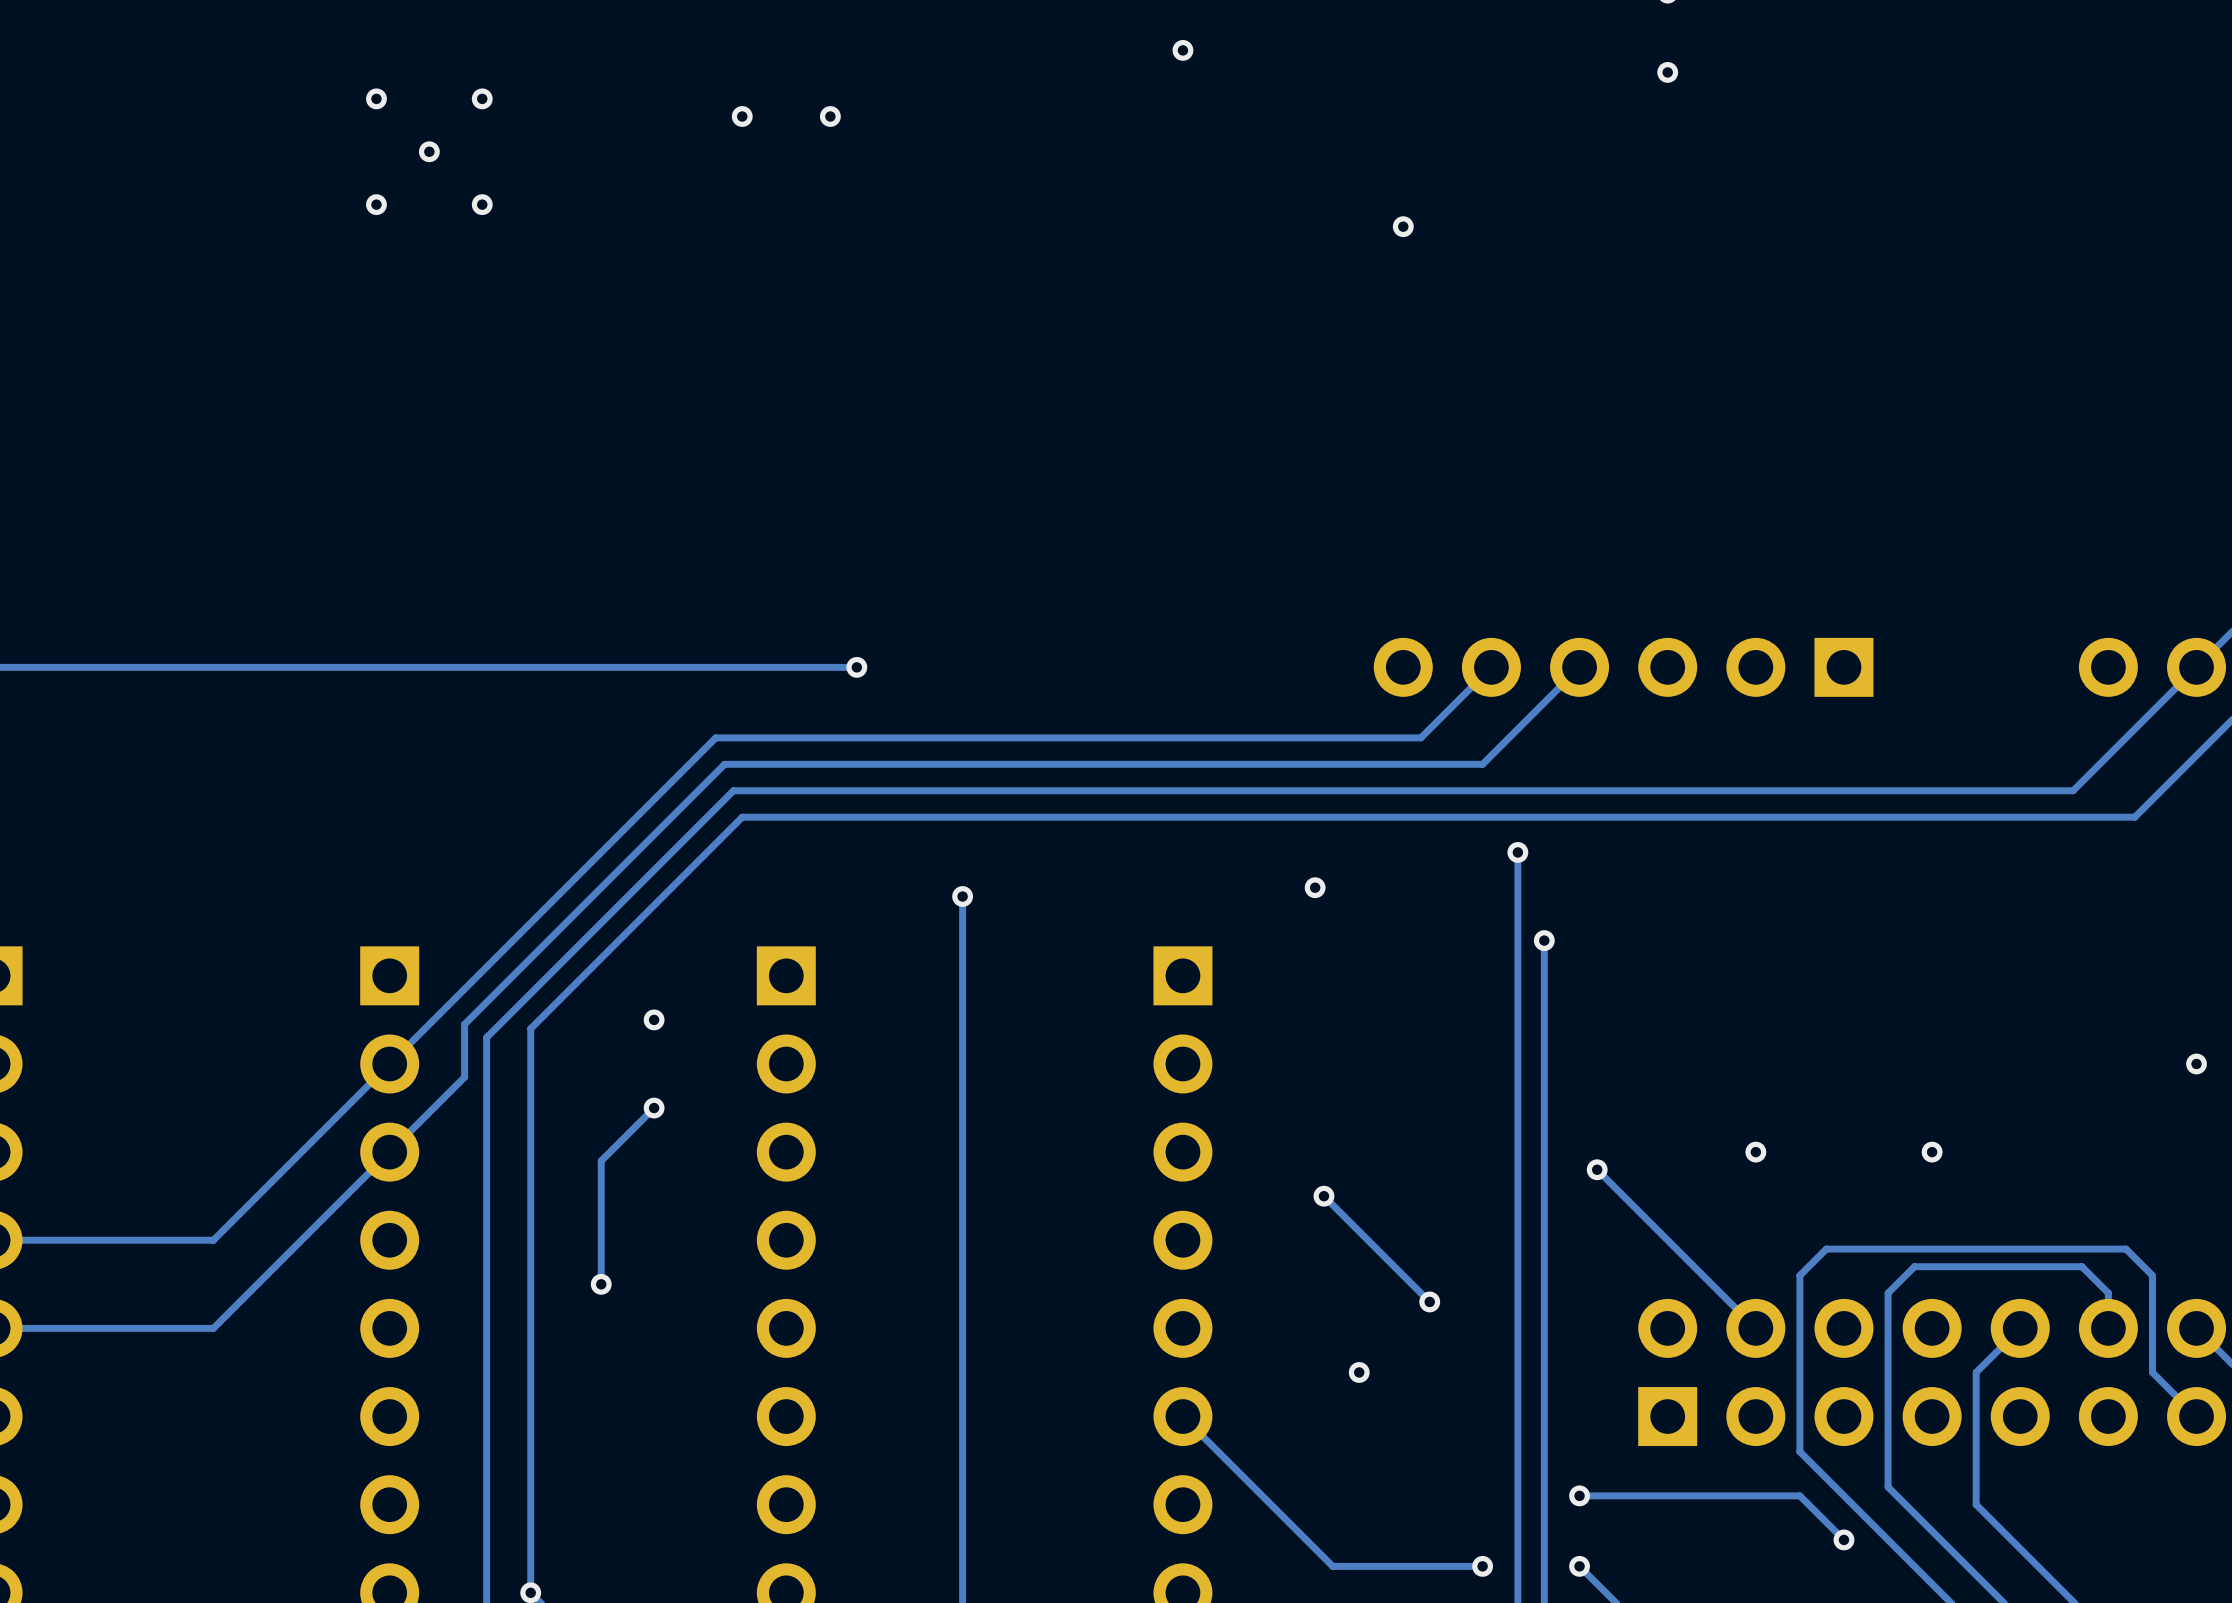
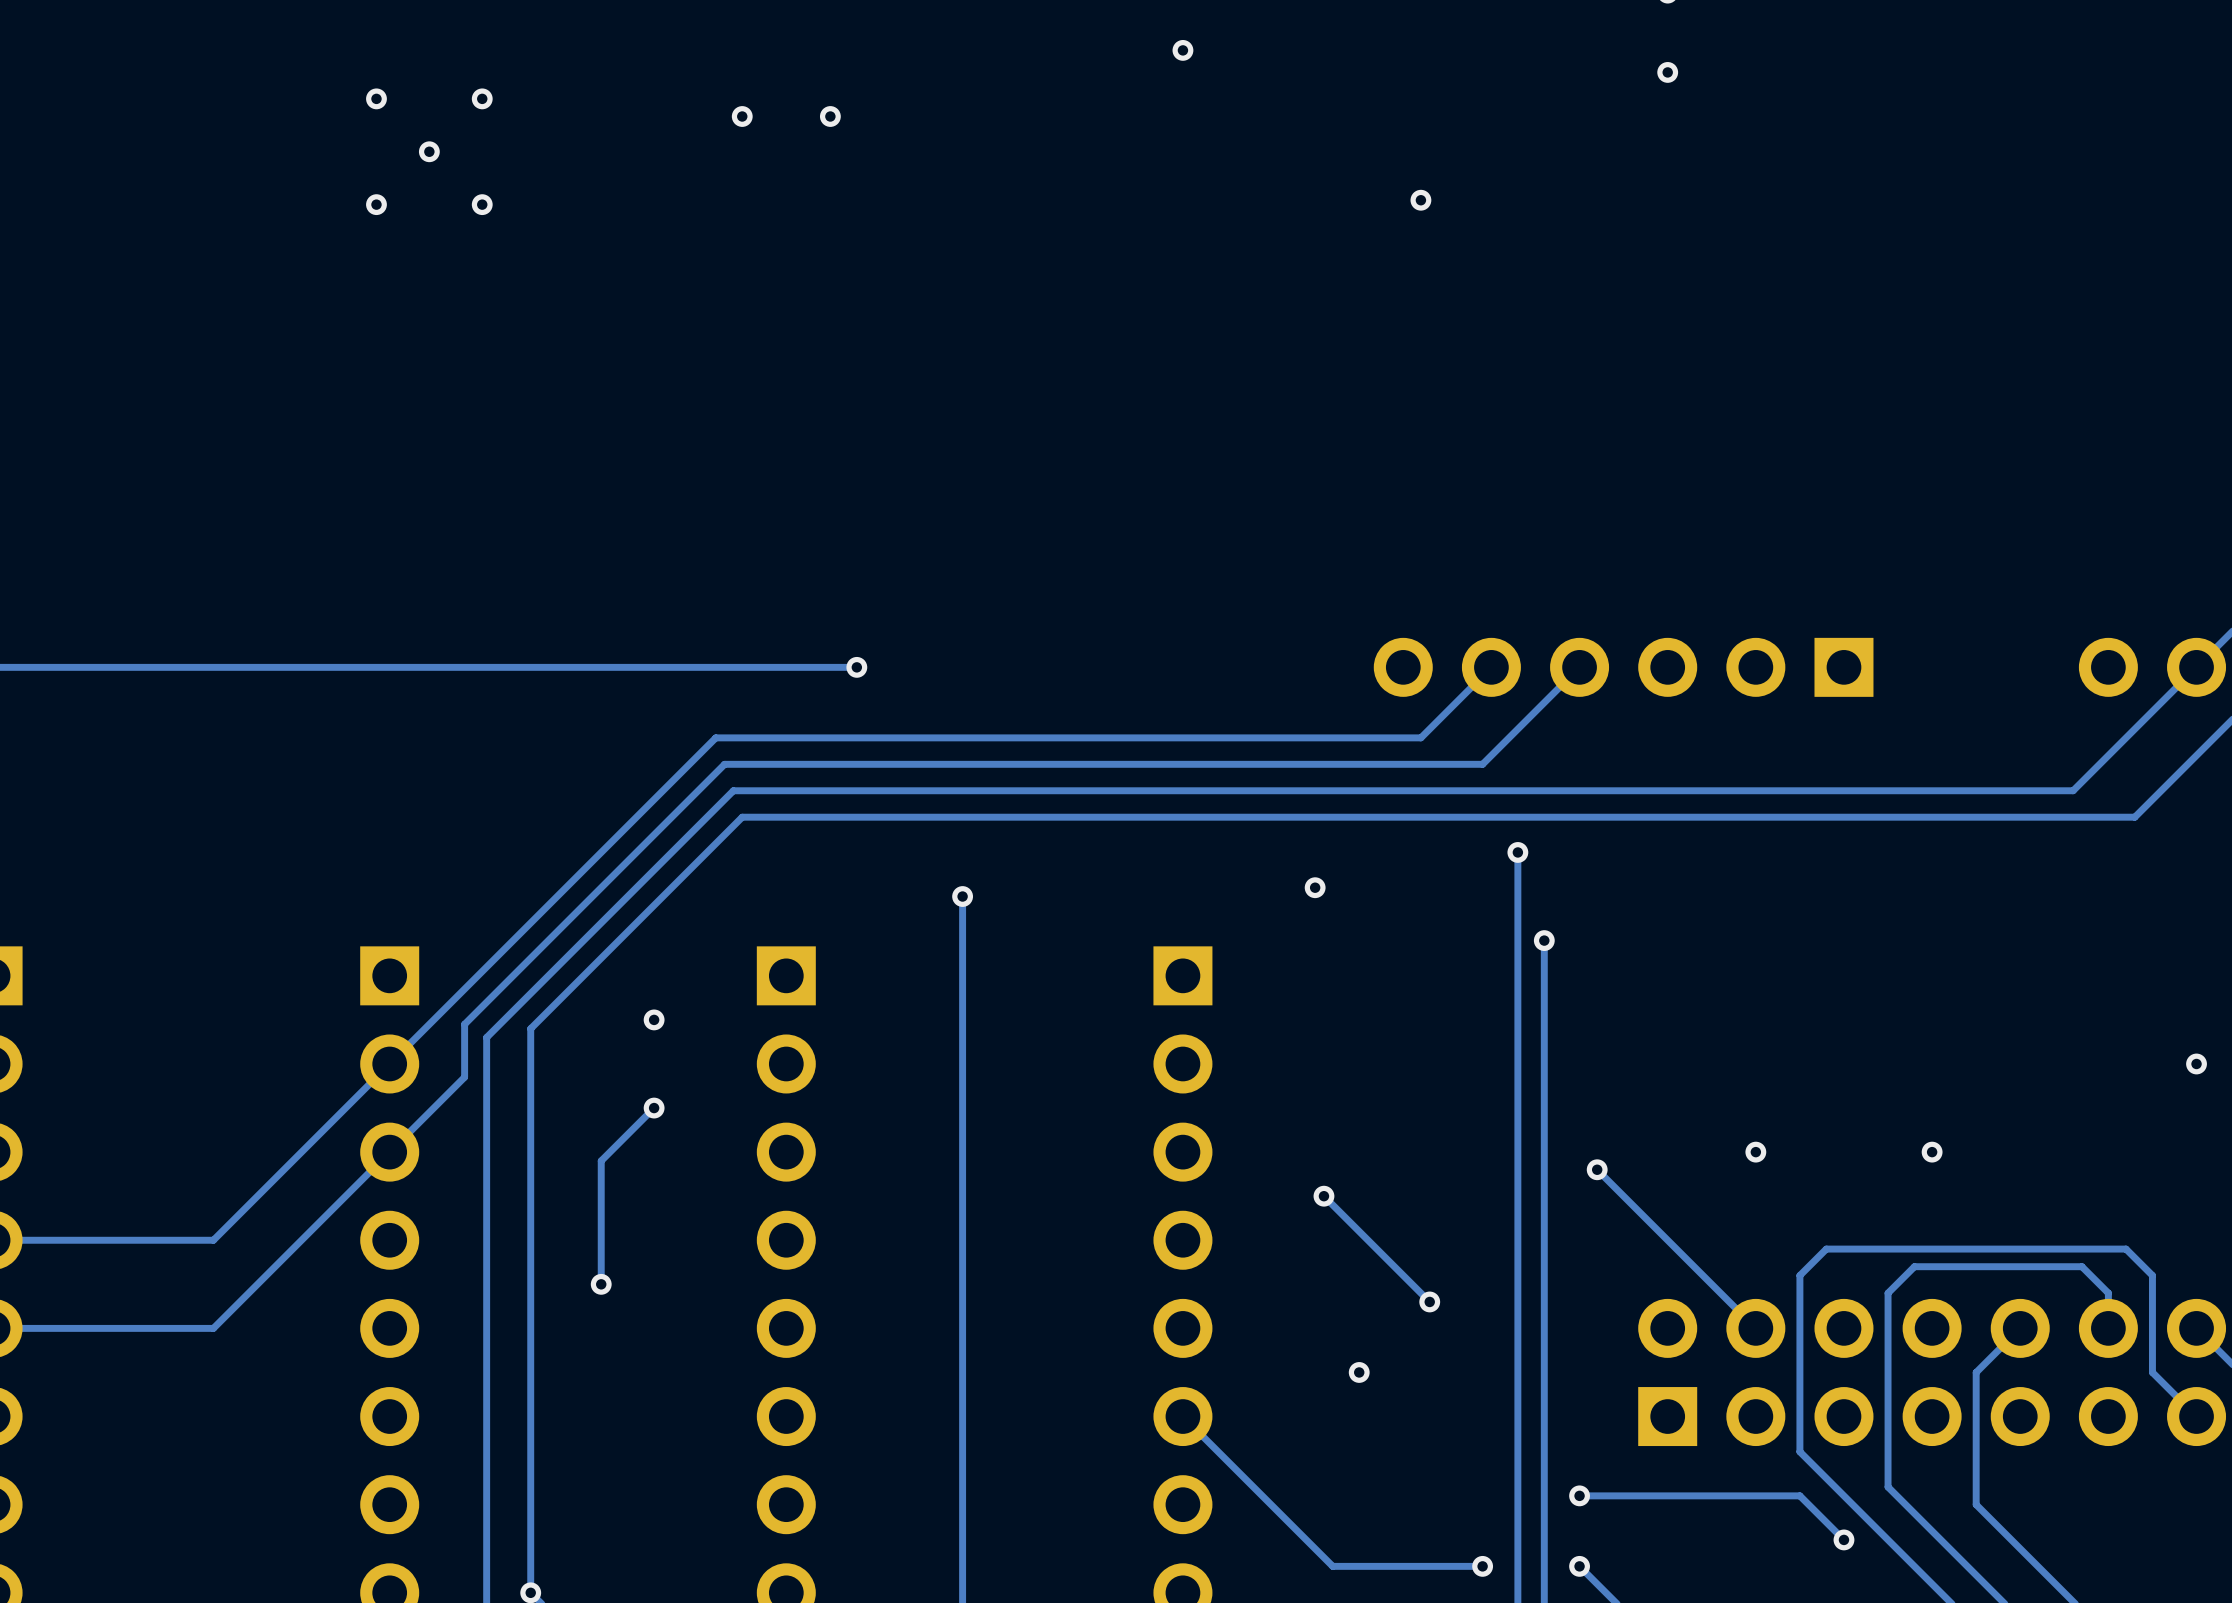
via position: (1403, 226) -> (1420, 200)

